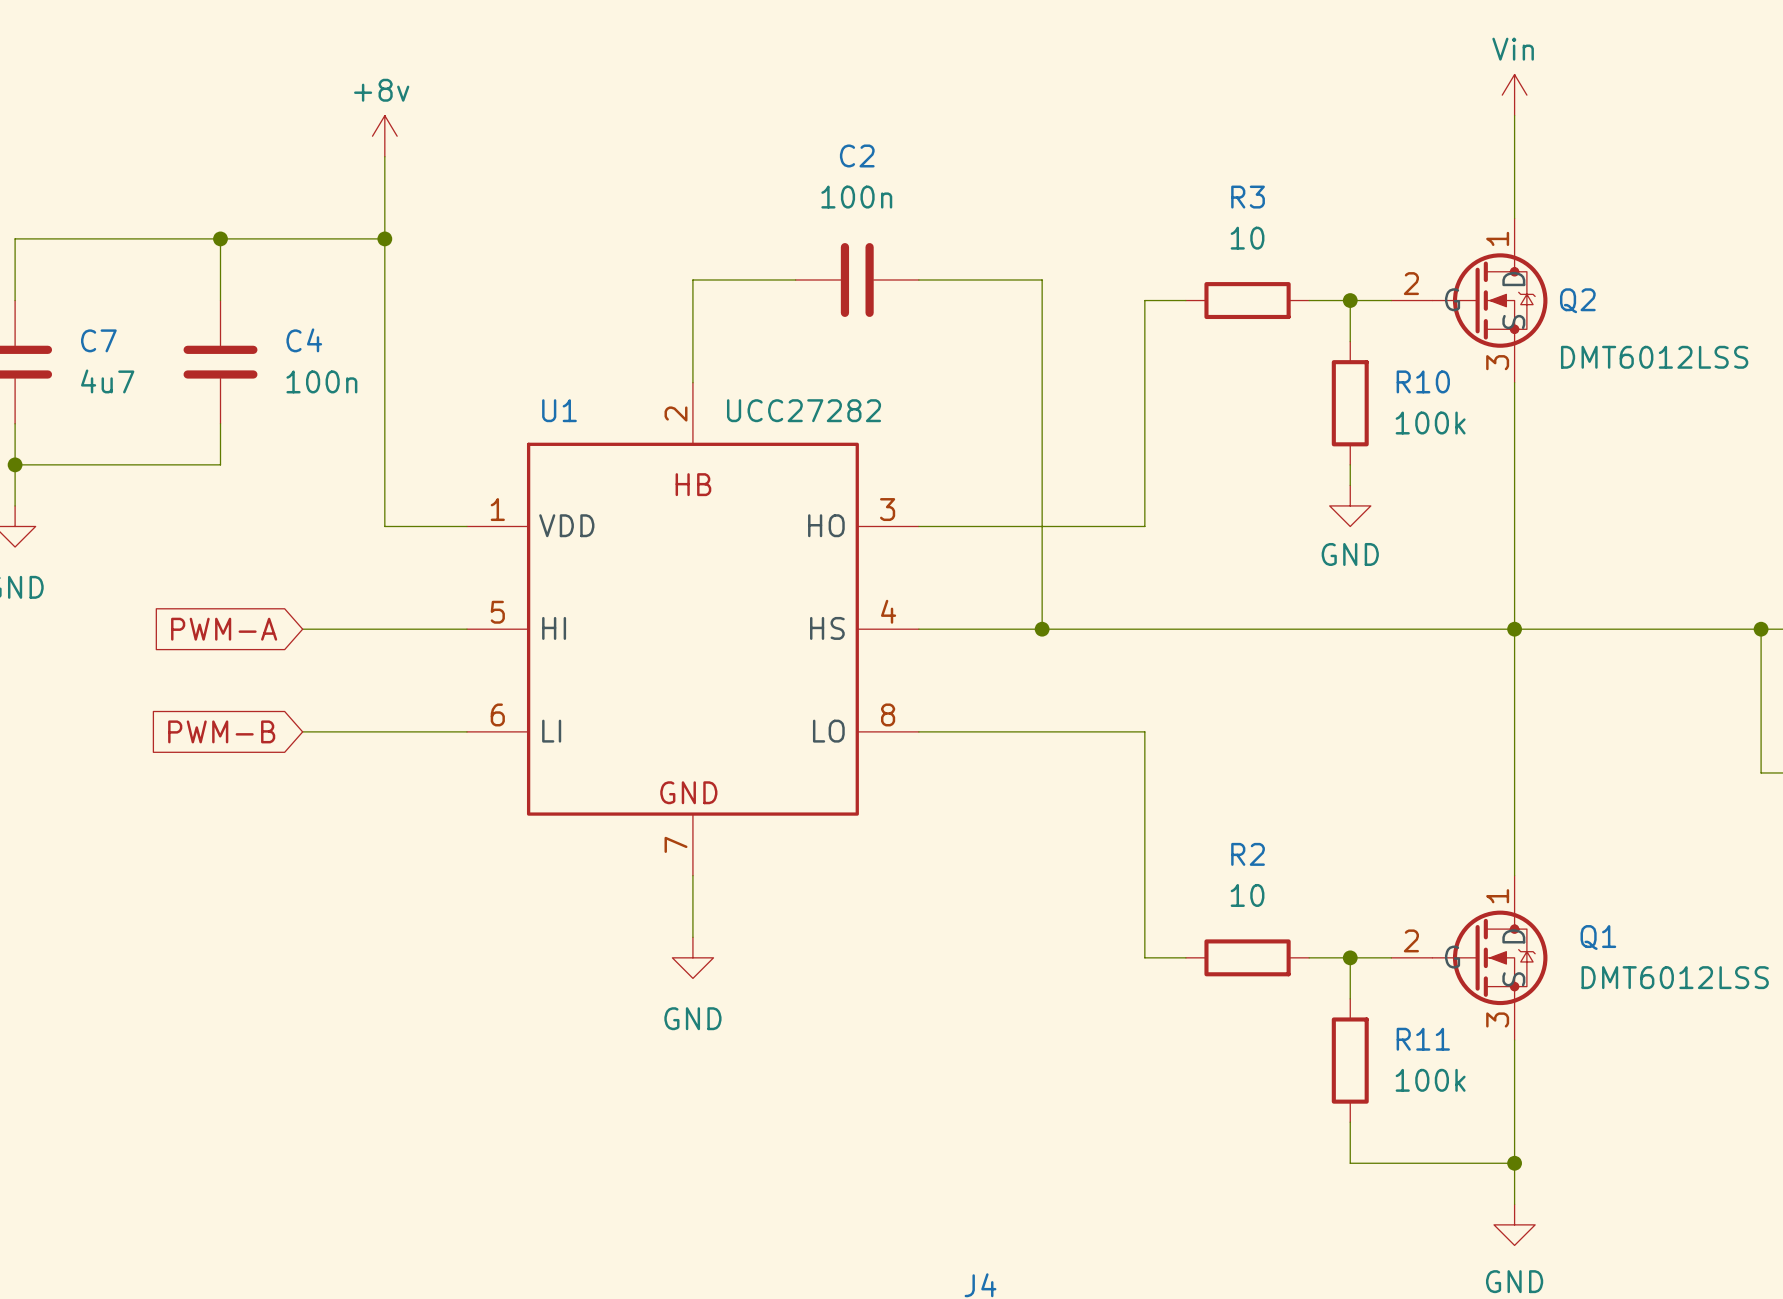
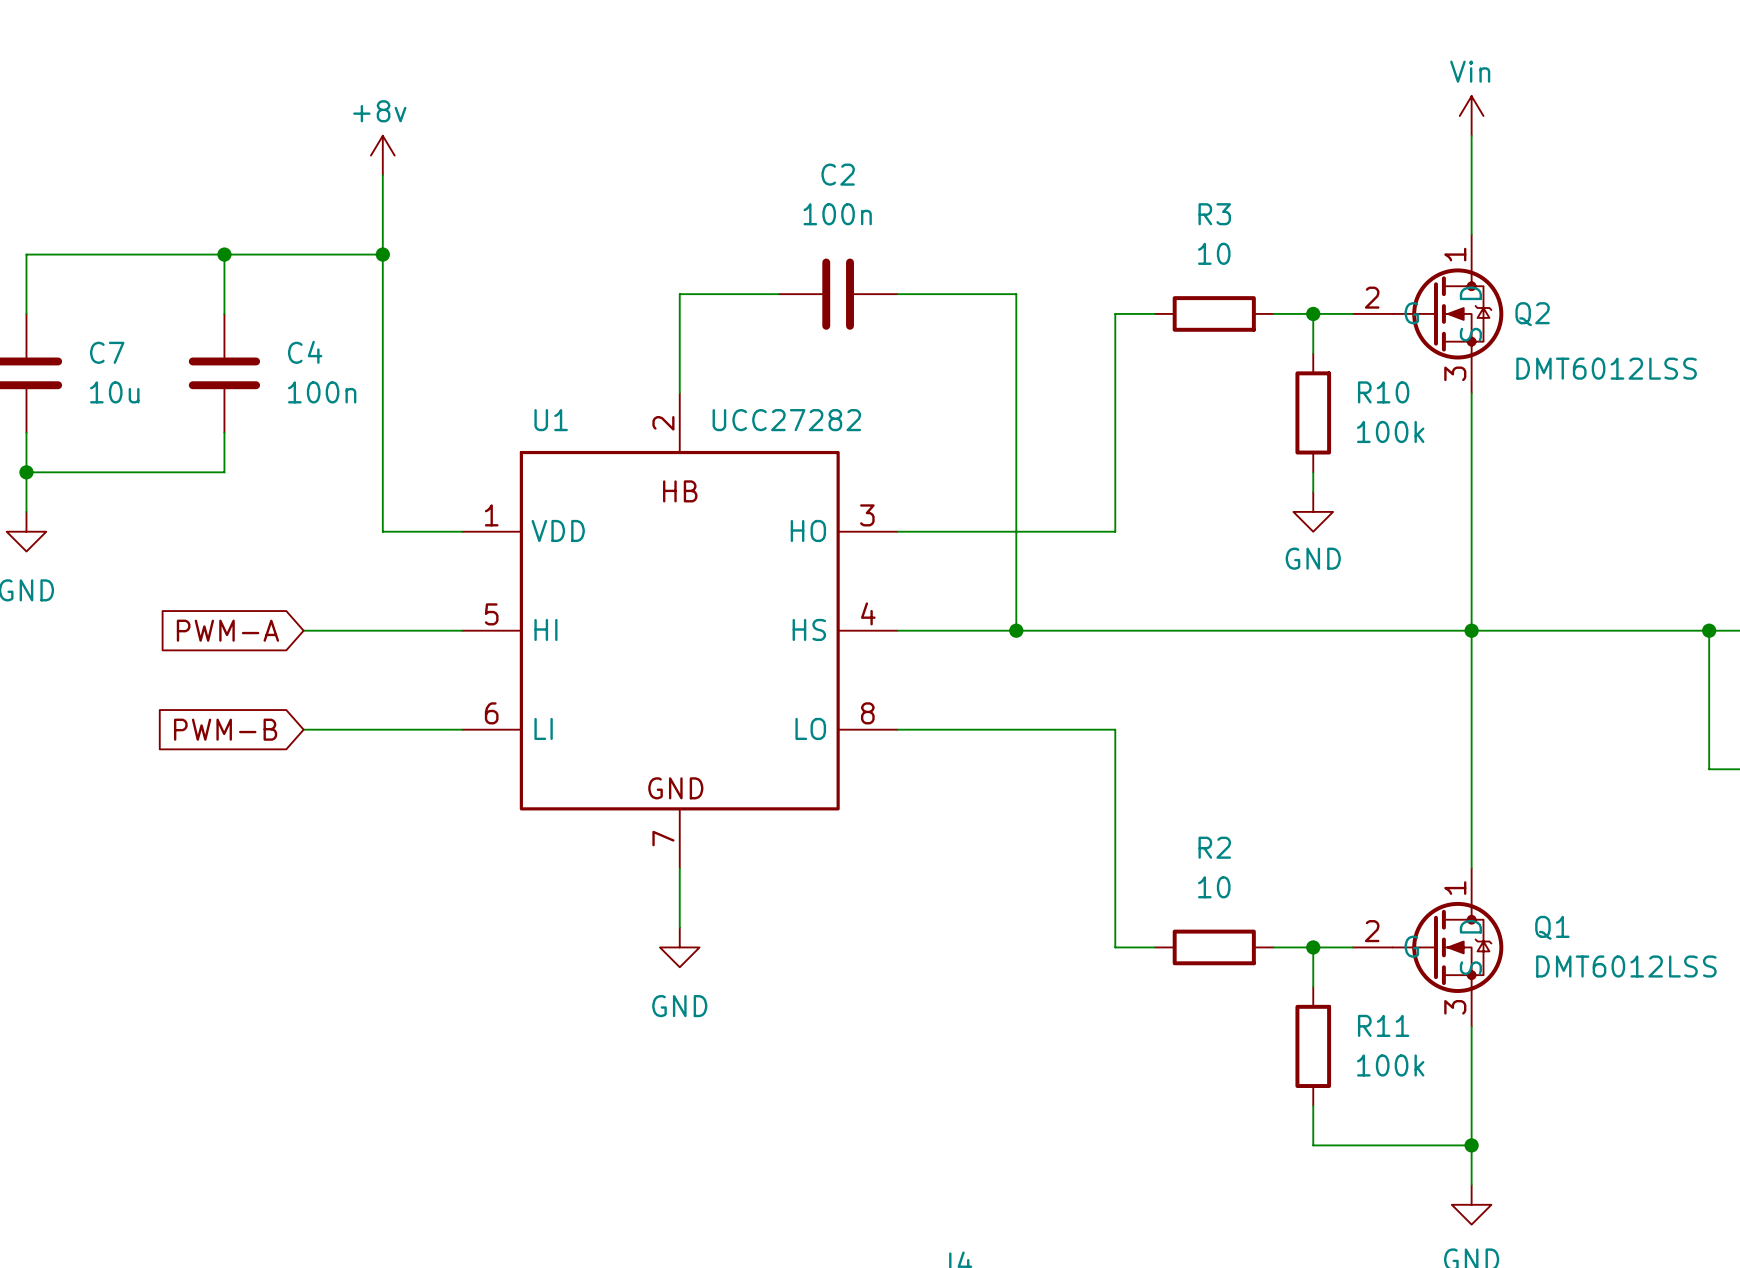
C7 value: 4u7 (107, 381) -> 10u (114, 392)

